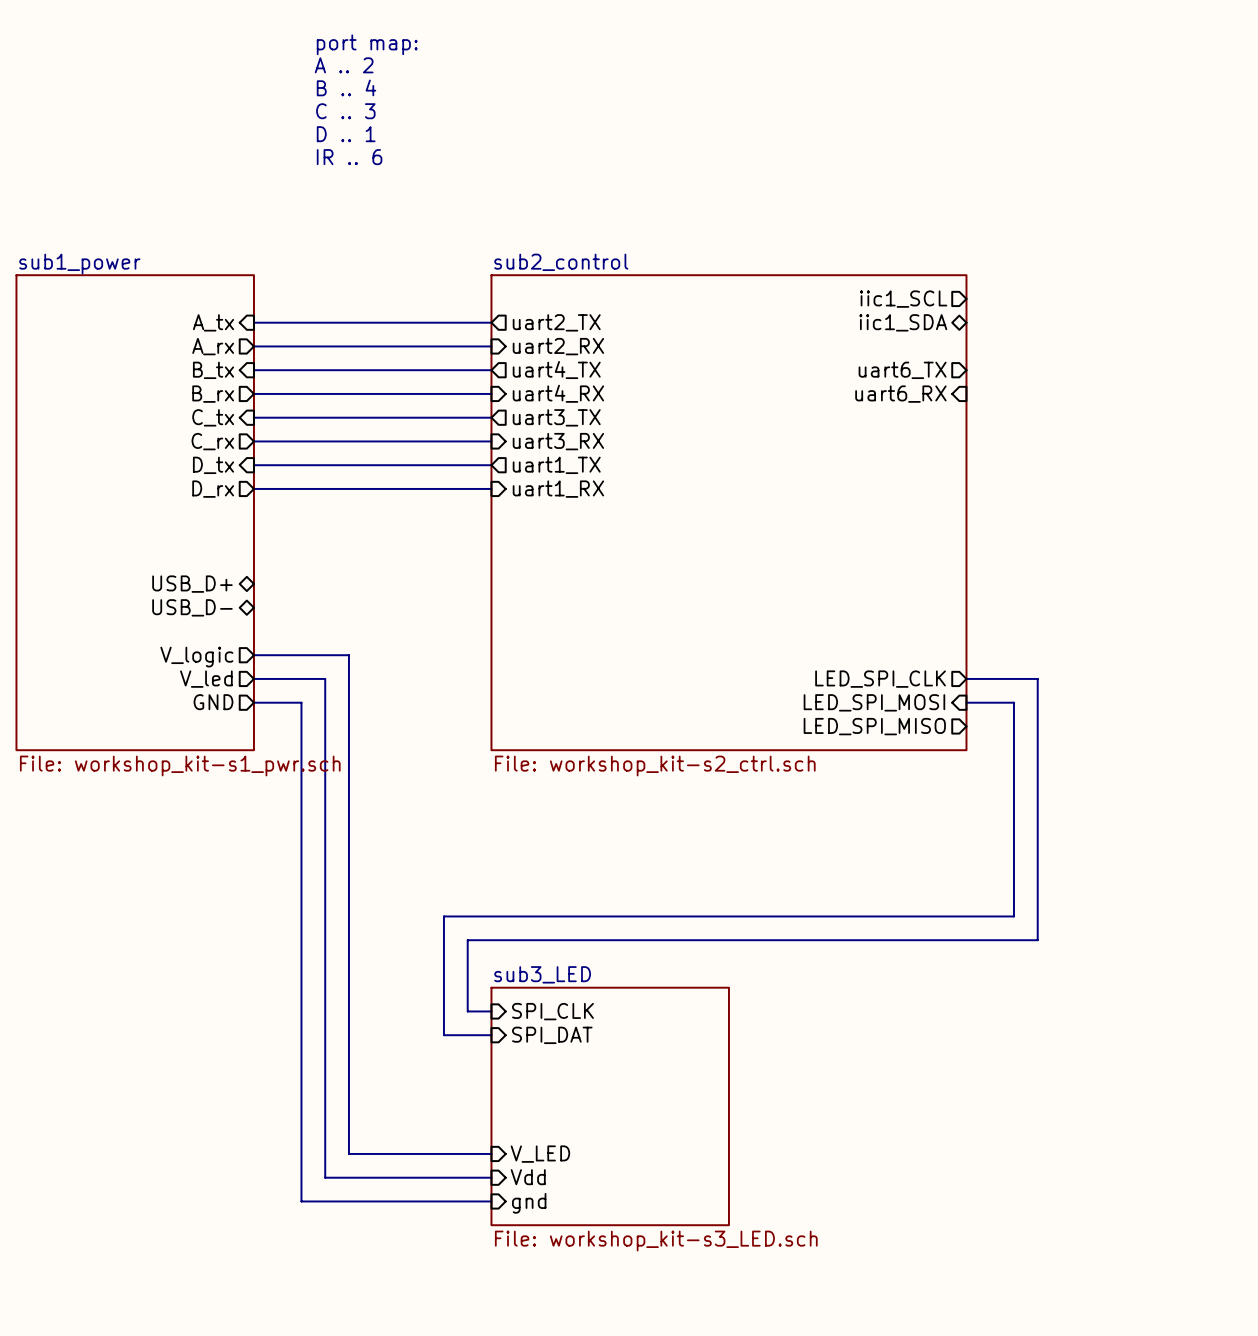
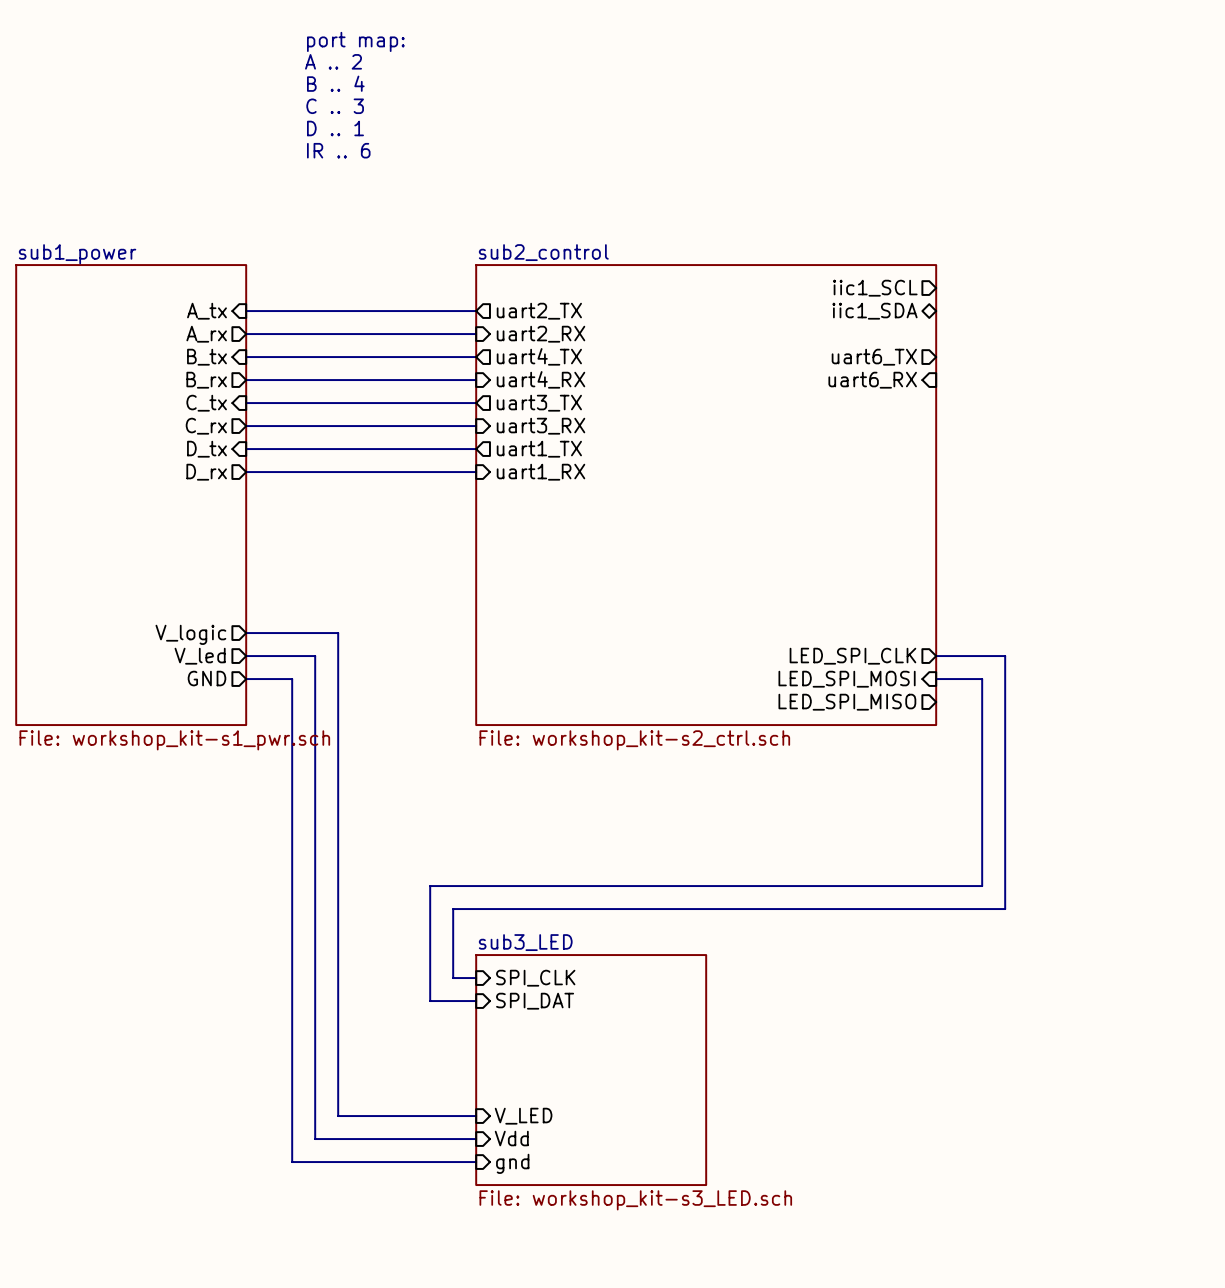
sheet pin: USB_D+ (192, 584) -> none
sheet pin: USB_D- (192, 607) -> none

